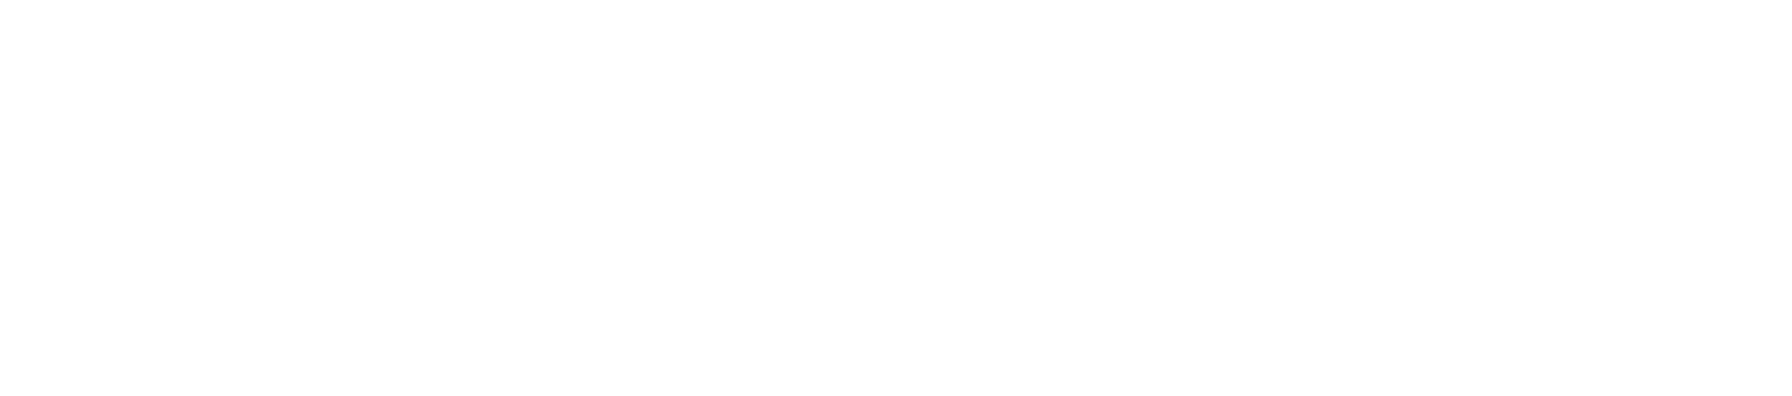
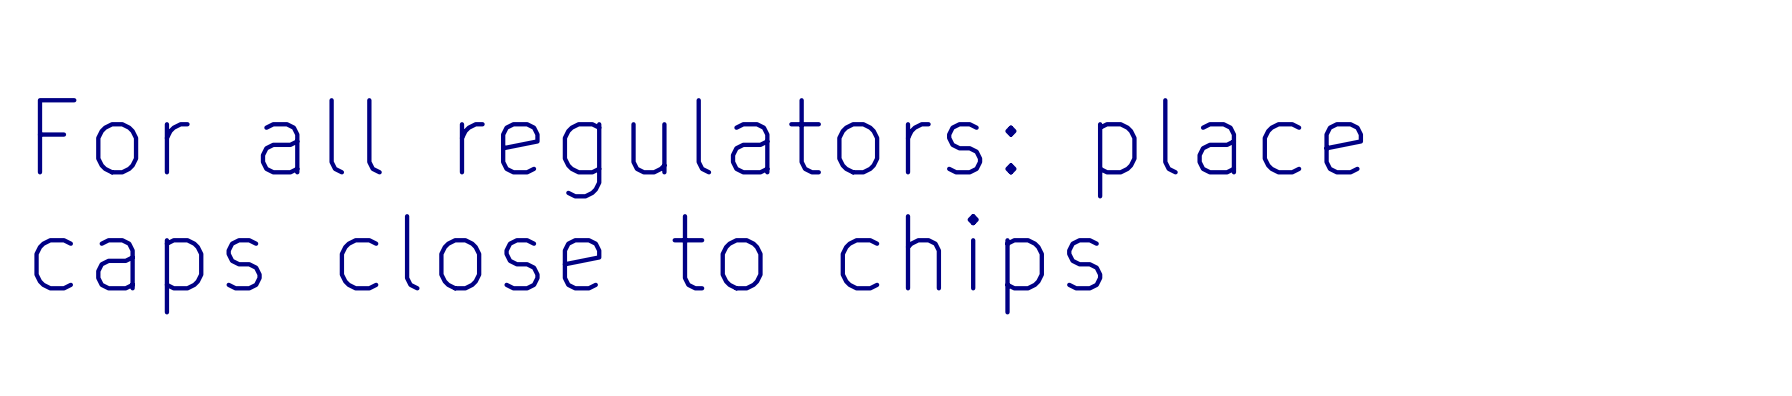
text: none -> For all regulators: place (700, 148)
text: none -> caps close to chips (568, 264)

